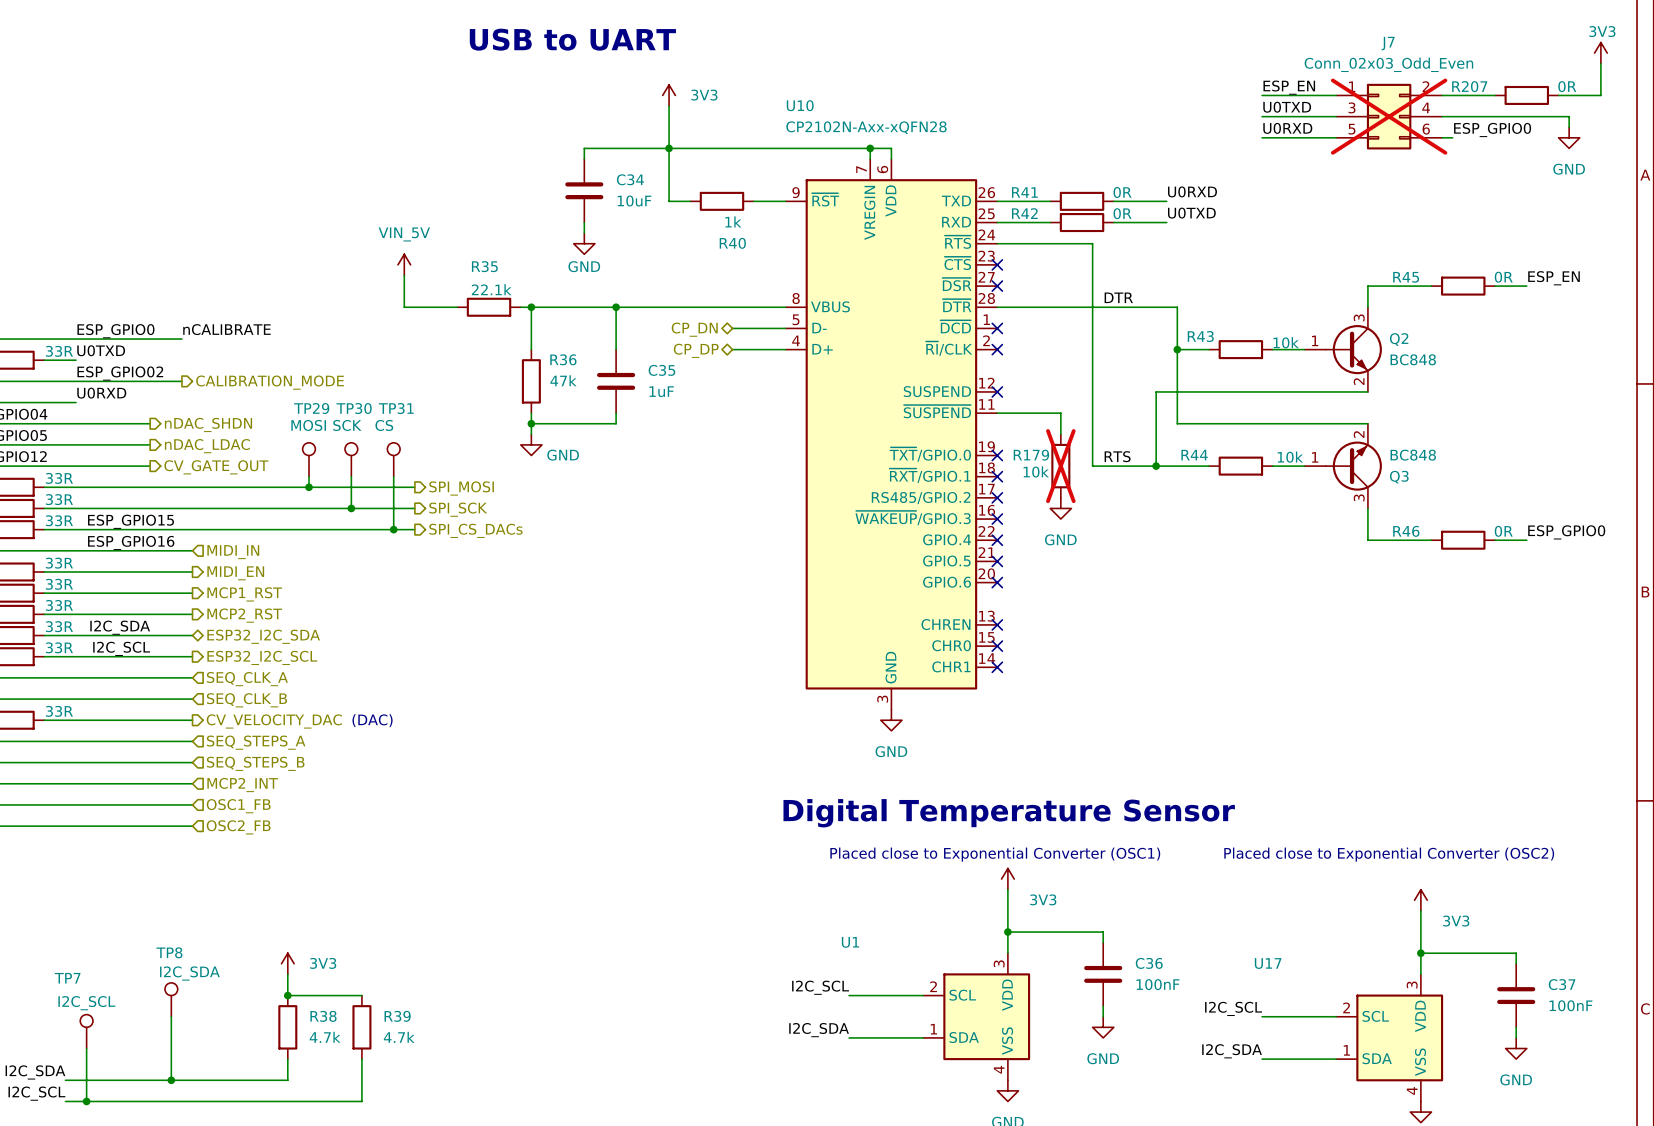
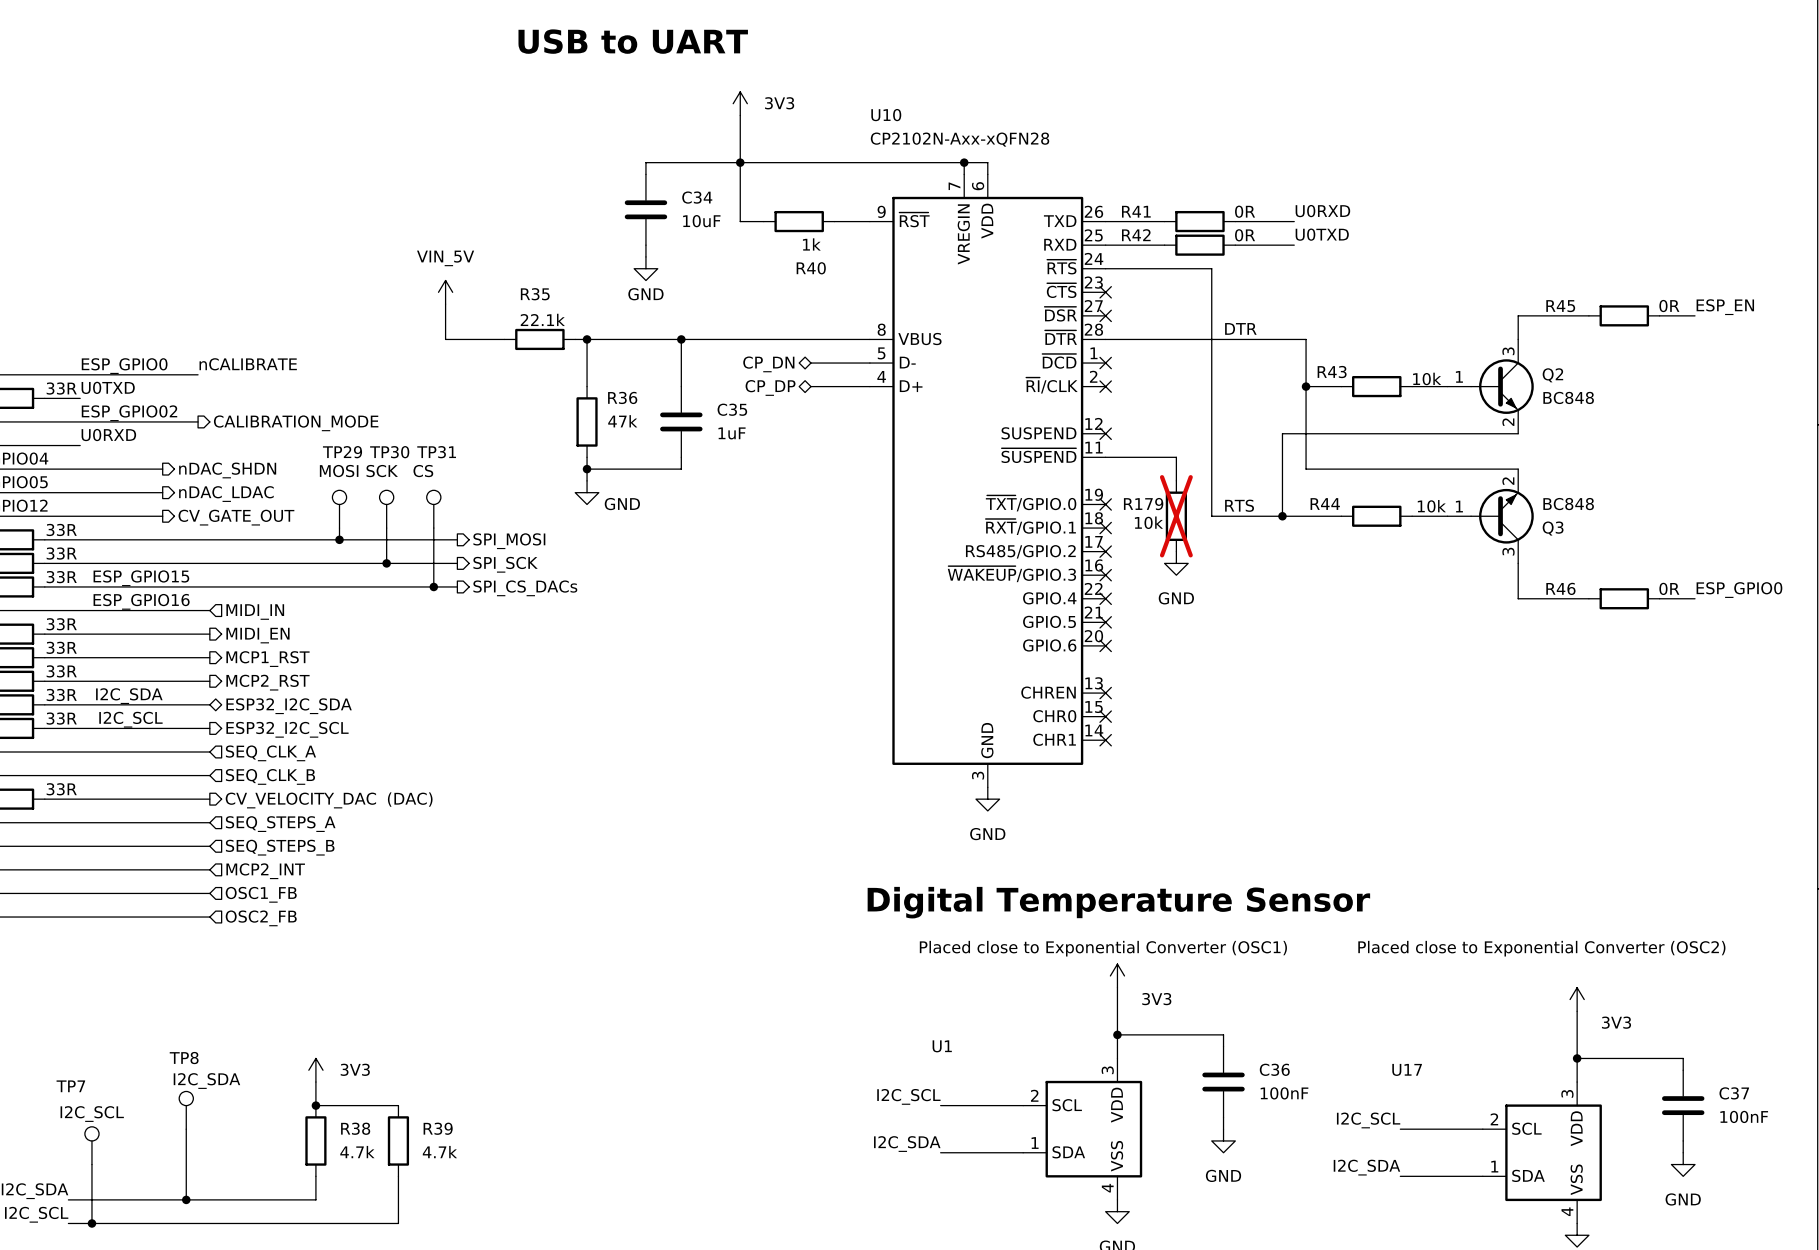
power symbol: 3V3 (1600, 53) -> none
wire: (1600, 63) (1600, 95) (1558, 95) -> none
label: ESP_EN (1289, 87) -> none
wire: (1262, 95) (1336, 95) -> none
wire: (1442, 95) (1495, 95) -> none
R207: 0R (1526, 95) -> none
label: U0TXD (1287, 107) -> none
wire: (1262, 116) (1336, 116) -> none
J7: Conn_02x03_Odd_Even (1389, 116) -> none
wire: (1442, 116) (1569, 116) (1569, 127) -> none
label: U0RXD (1287, 128) -> none
label: ESP_GPIO0 (1492, 129) -> none
wire: (1262, 137) (1336, 137) -> none
wire: (1442, 137) (1452, 137) -> none
power symbol: GND (1569, 137) -> none

